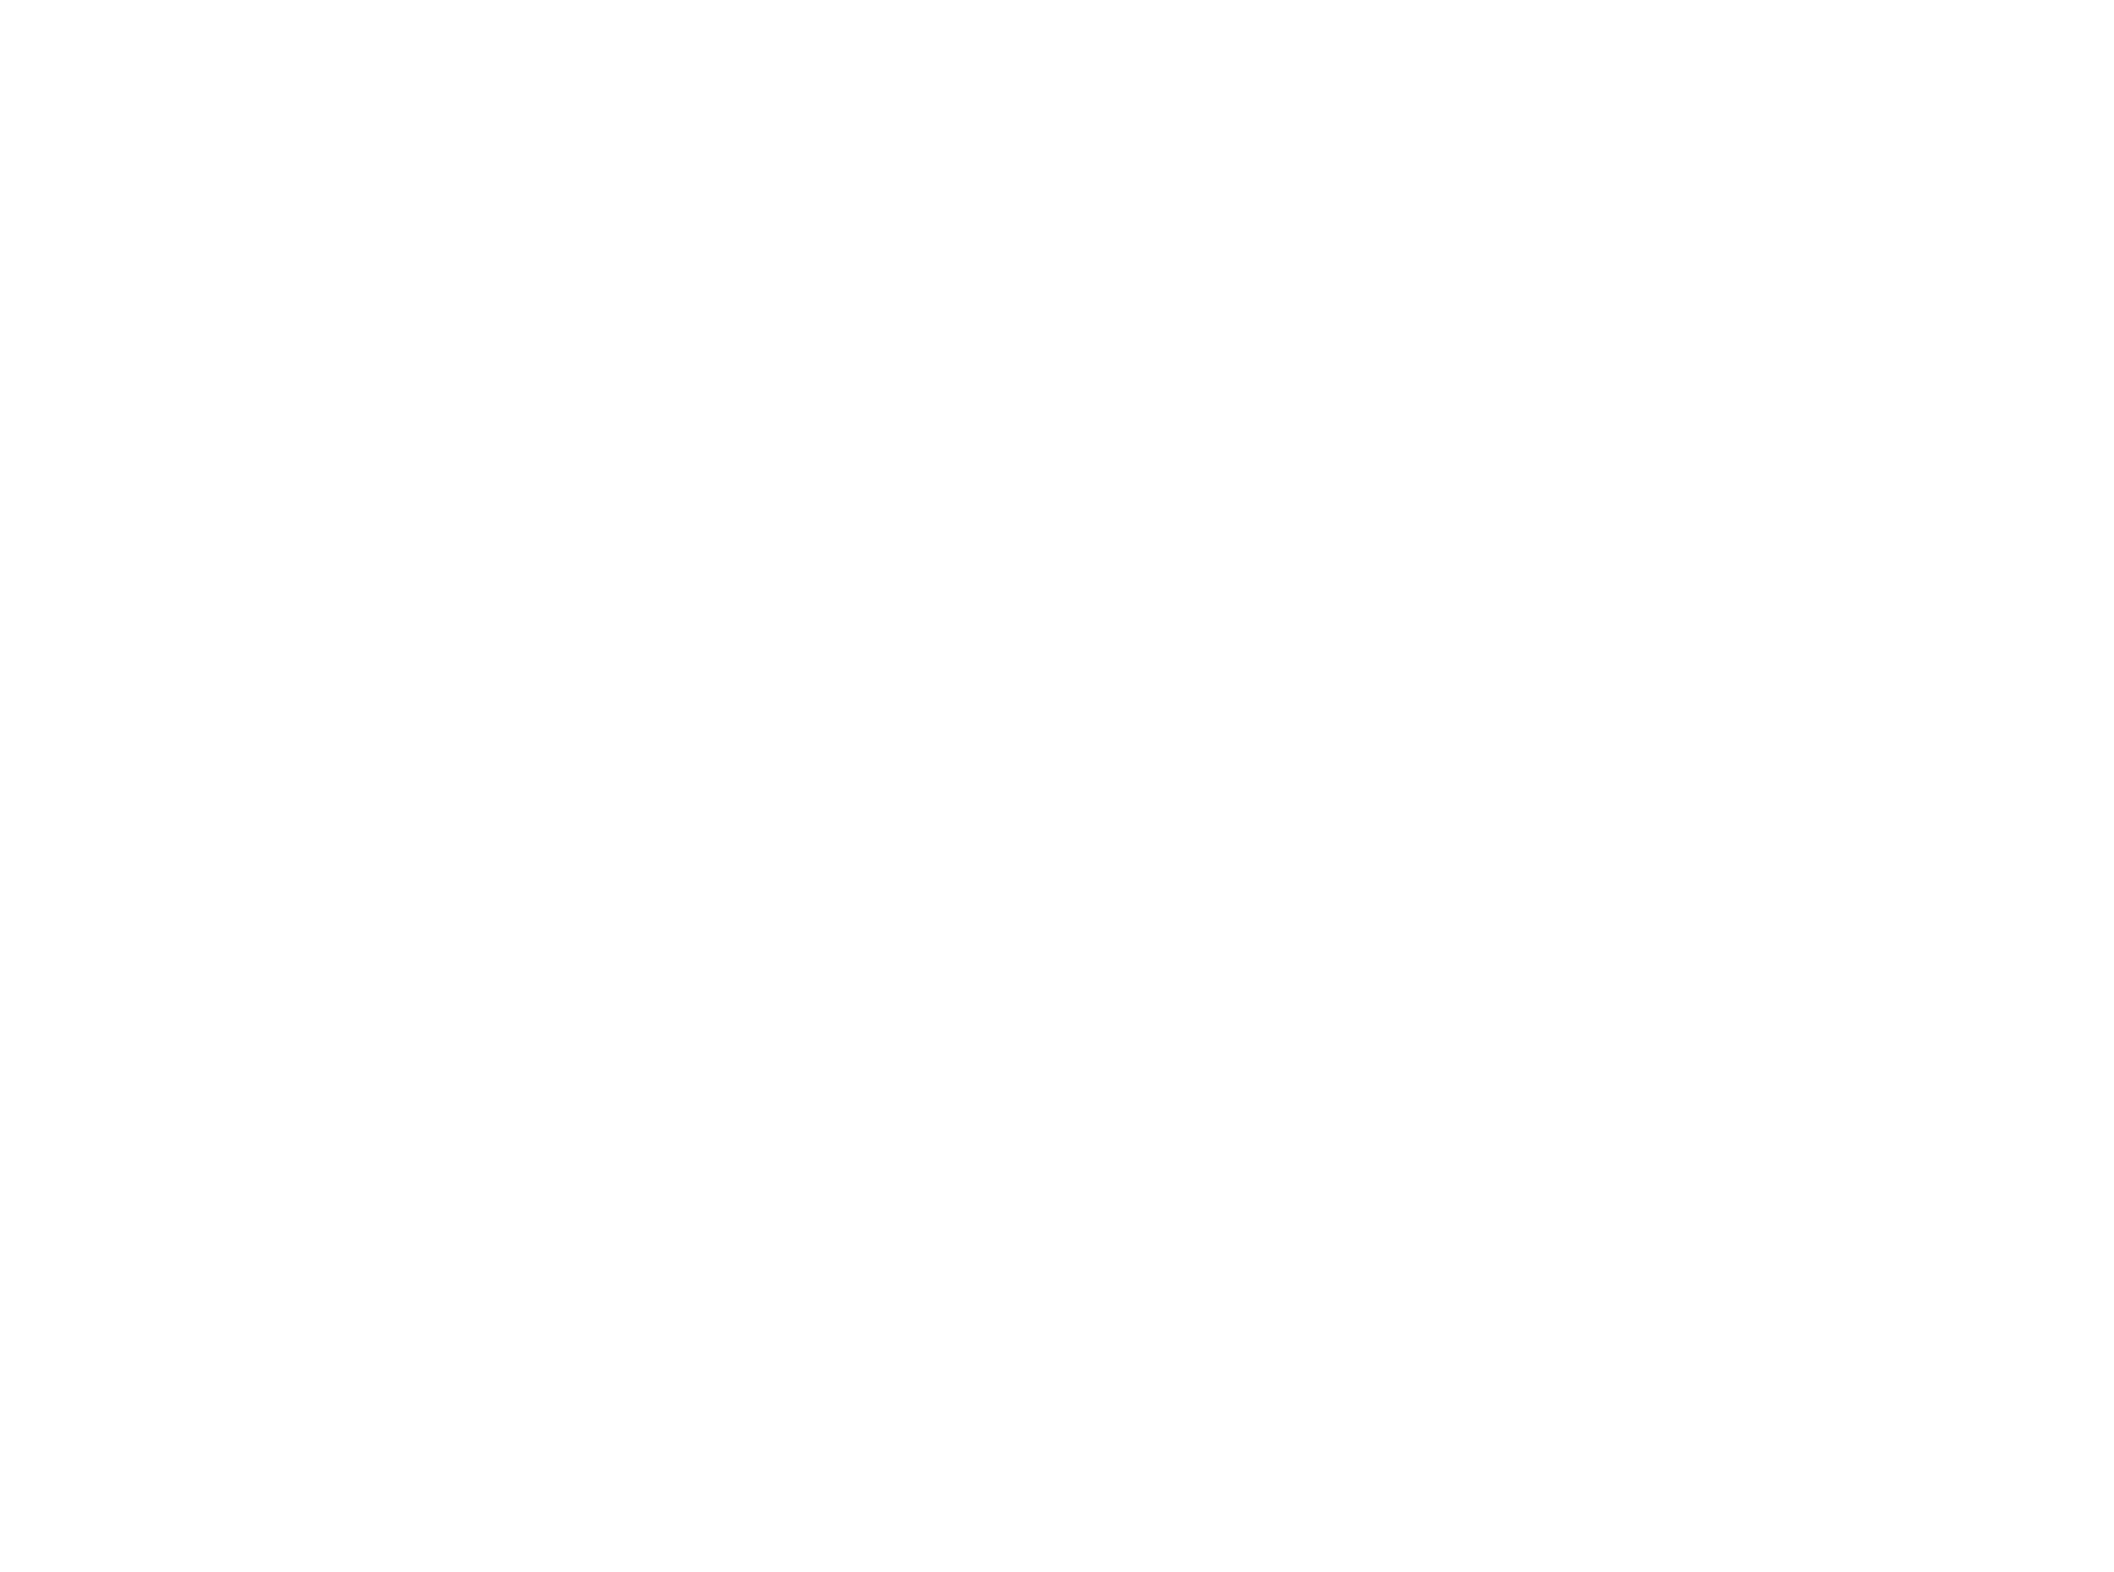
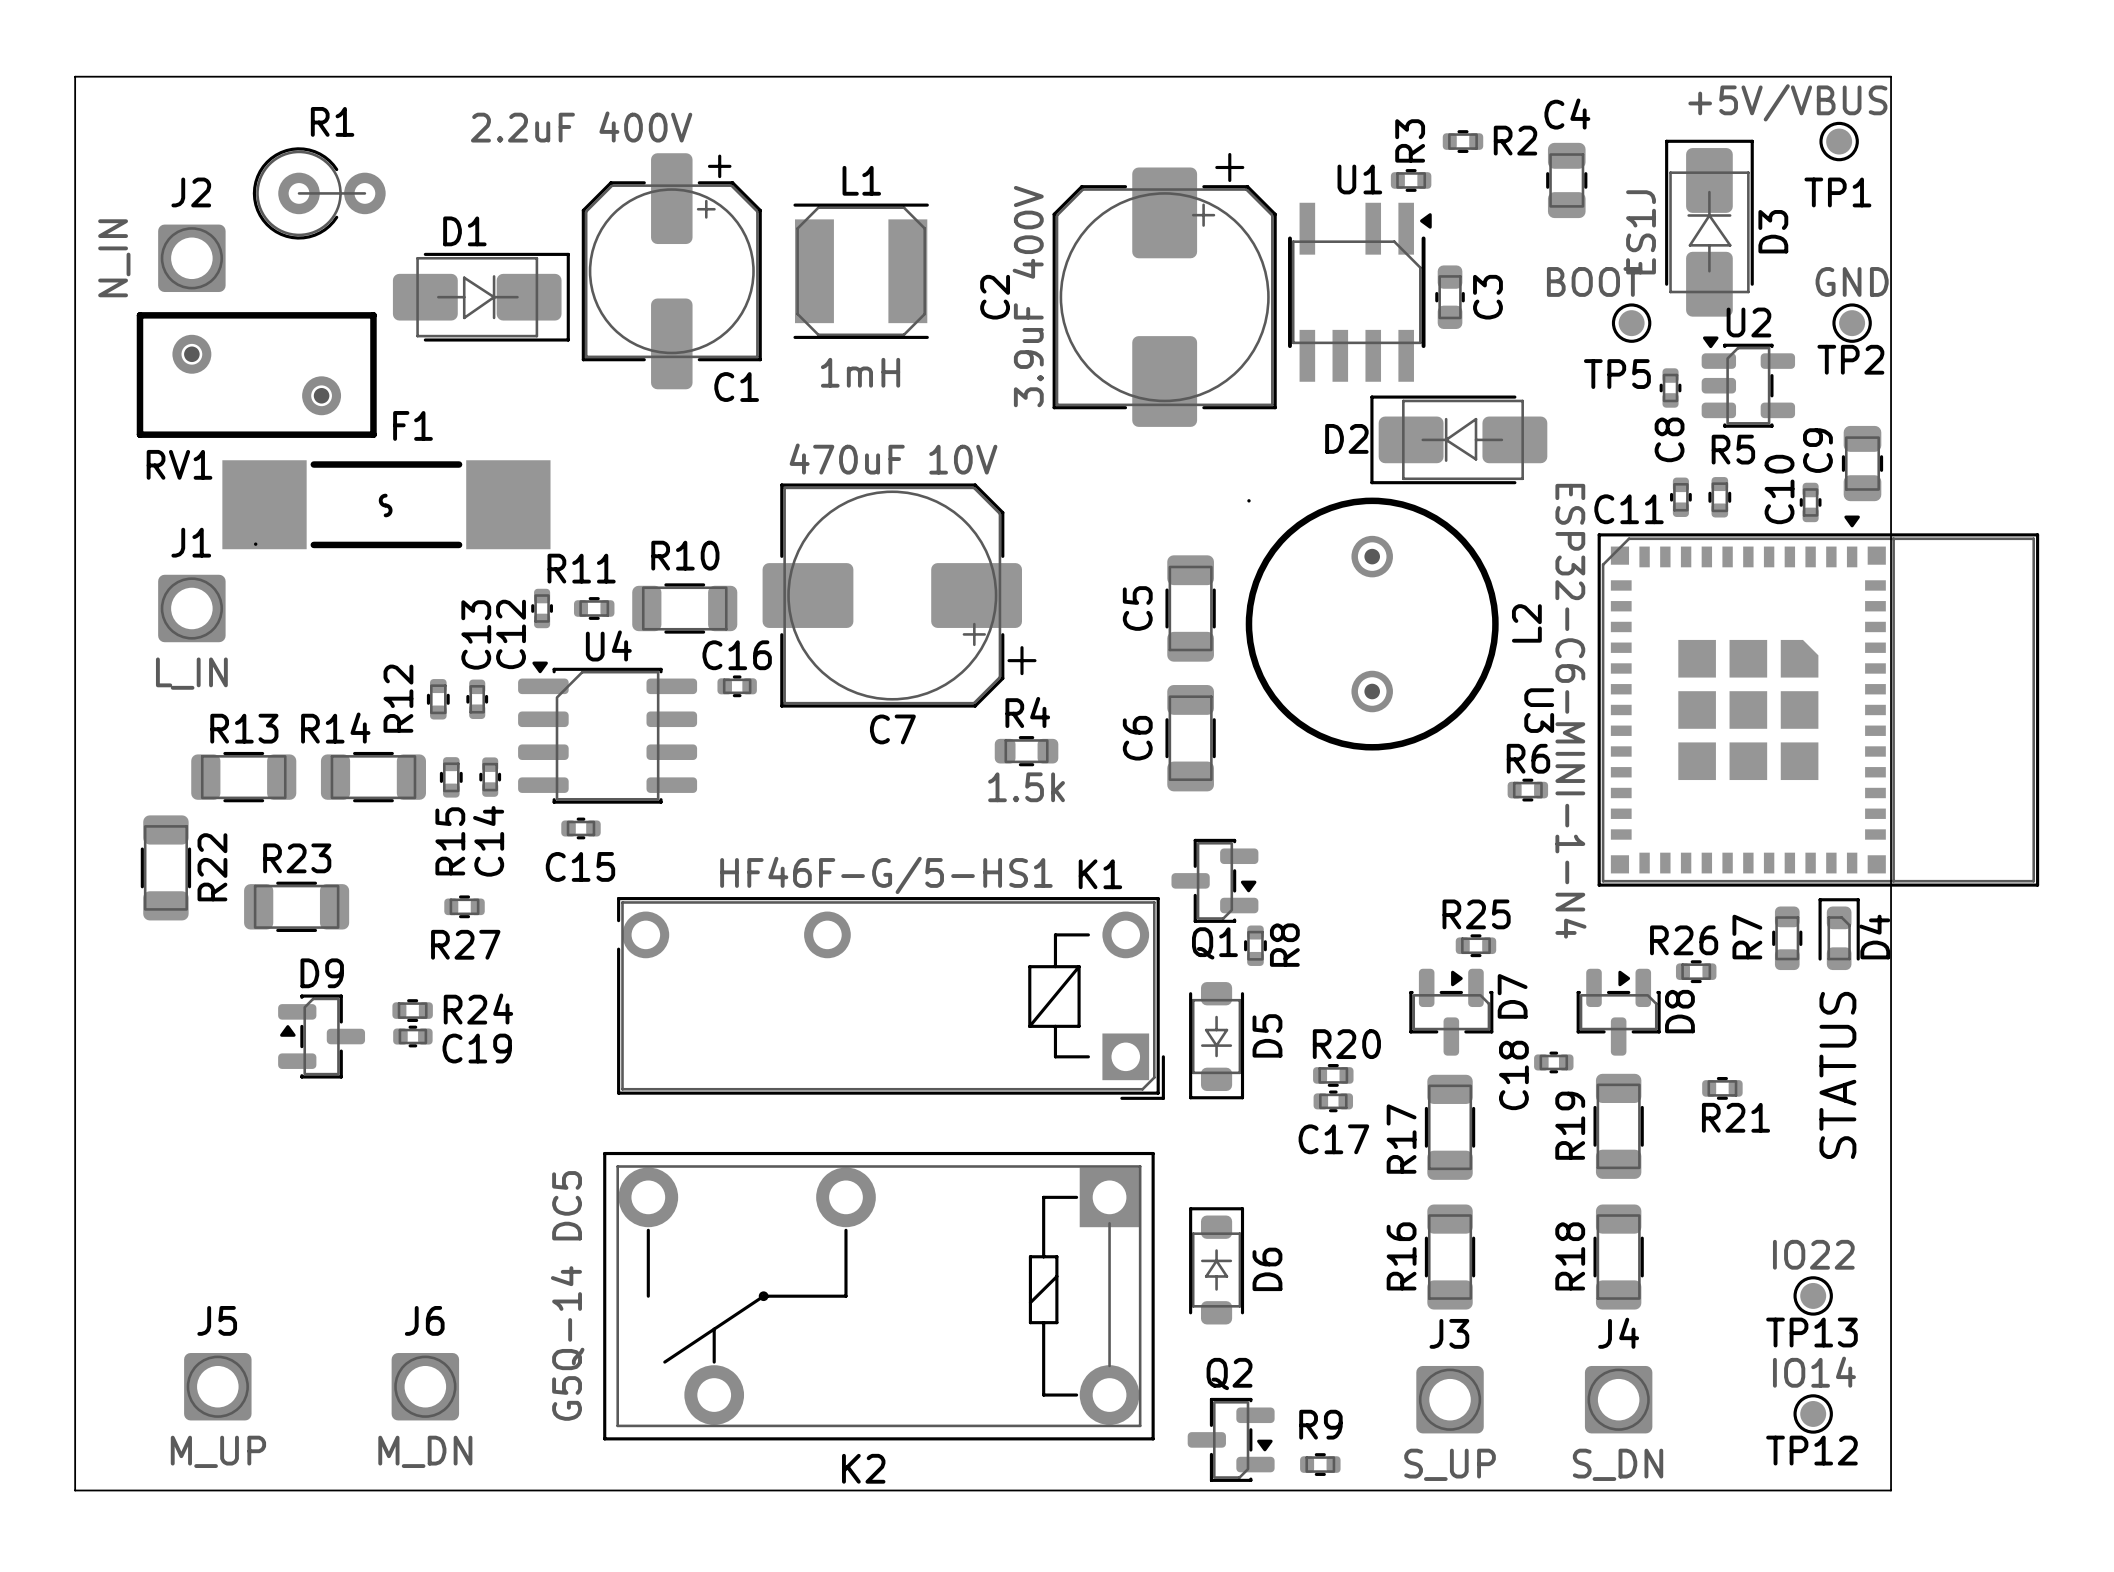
board edge: none -> (75, 76) (1891, 76) (1891, 1490) (75, 1490) (75, 76)
R2: none -> (1463, 141)
TP1: none -> +5V/VBUS (1839, 141)
R3: none -> (1411, 180)
C4: none -> (1566, 180)
R1: none -> (319, 193)
D3: none -> ES1J (1709, 228)
J2: none -> N_IN (191, 258)
C1: none -> 2.2uF 400V (671, 271)
L1: none -> 1mH (861, 271)
C2: none -> 3.9uF 400V (1164, 289)
U1: none -> (1359, 292)
D1: none -> (481, 297)
C3: none -> (1450, 297)
TP5: none -> BOOT (1631, 323)
TP2: none -> GND (1852, 323)
RV1: none -> (256, 375)
U2: none -> (1748, 382)
C8: none -> (1670, 387)
D2: none -> (1458, 439)
C9: none -> (1862, 463)
C11: none -> (1680, 497)
R5: none -> (1719, 497)
C10: none -> (1810, 502)
F1: none -> (386, 504)
C7: none -> 470uF 10V (899, 595)
J1: none -> L_IN (191, 608)
C12: none -> (542, 608)
R11: none -> (594, 608)
R10: none -> (684, 608)
C5: none -> (1190, 608)
L2: none -> (1372, 624)
C16: none -> (737, 686)
R12: none -> (438, 699)
C13: none -> (477, 699)
U3: none -> ESP32-C6-MINI-1-N4 (1818, 701)
U4: none -> (607, 732)
C6: none -> (1190, 738)
R4: none -> 1.5k (1026, 751)
R13: none -> (243, 777)
R14: none -> (373, 777)
R15: none -> (451, 777)
C14: none -> (490, 777)
R6: none -> (1527, 790)
C15: none -> (580, 828)
R22: none -> (165, 867)
Q1: none -> (1214, 880)
R23: none -> (296, 906)
R27: none -> (464, 906)
D4: none -> (1839, 934)
R7: none -> (1787, 938)
R8: none -> (1255, 945)
R25: none -> (1475, 945)
R26: none -> (1696, 971)
K1: none -> HF46F-G/5-HS1 (890, 998)
R24: none -> (412, 1010)
D7: none -> (1451, 1012)
D8: none -> (1618, 1012)
D9: none -> (321, 1036)
C19: none -> (412, 1036)
D5: none -> (1216, 1040)
C18: none -> (1553, 1062)
R20: none -> (1333, 1075)
R21: none -> (1722, 1088)
C17: none -> (1333, 1101)
R19: none -> (1618, 1126)
R17: none -> (1450, 1127)
R16: none -> (1450, 1257)
R18: none -> (1618, 1257)
D6: none -> (1216, 1265)
TP13: none -> IO22 (1813, 1295)
K2: none -> G5Q-14 DC5 (878, 1296)
J5: none -> M_UP (217, 1386)
J6: none -> M_DN (425, 1386)
J3: none -> S_UP (1450, 1399)
J4: none -> S_DN (1618, 1399)
TP12: none -> IO14 (1813, 1413)
Q2: none -> (1231, 1439)
R9: none -> (1320, 1464)

